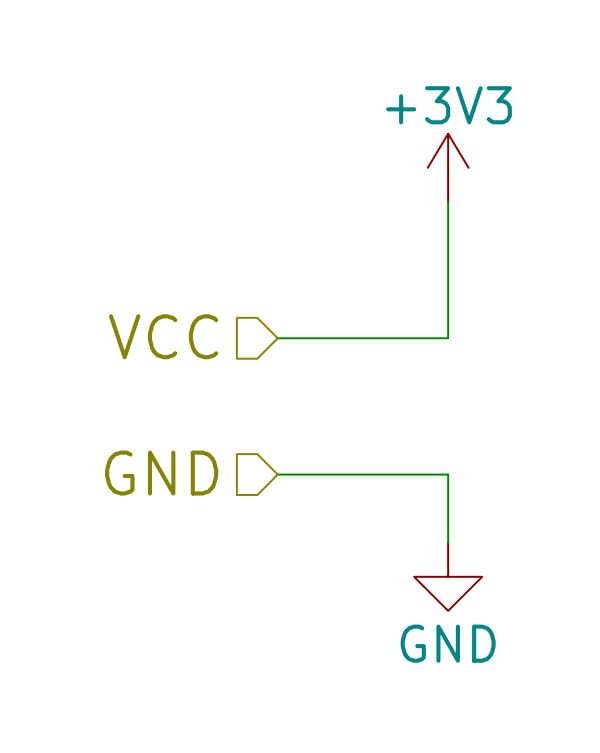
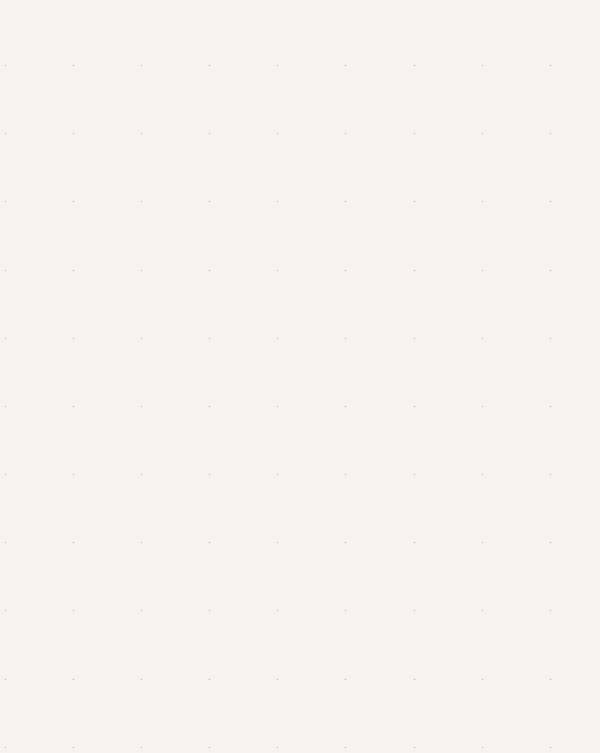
power symbol: +3V3 (448, 167) -> none
wire: (448, 201) (448, 338) (277, 338) -> none
hierarchical label: VCC (163, 336) -> none
hierarchical label: GND (161, 473) -> none
wire: (277, 474) (448, 474) (448, 542) -> none
power symbol: GND (448, 576) -> none

